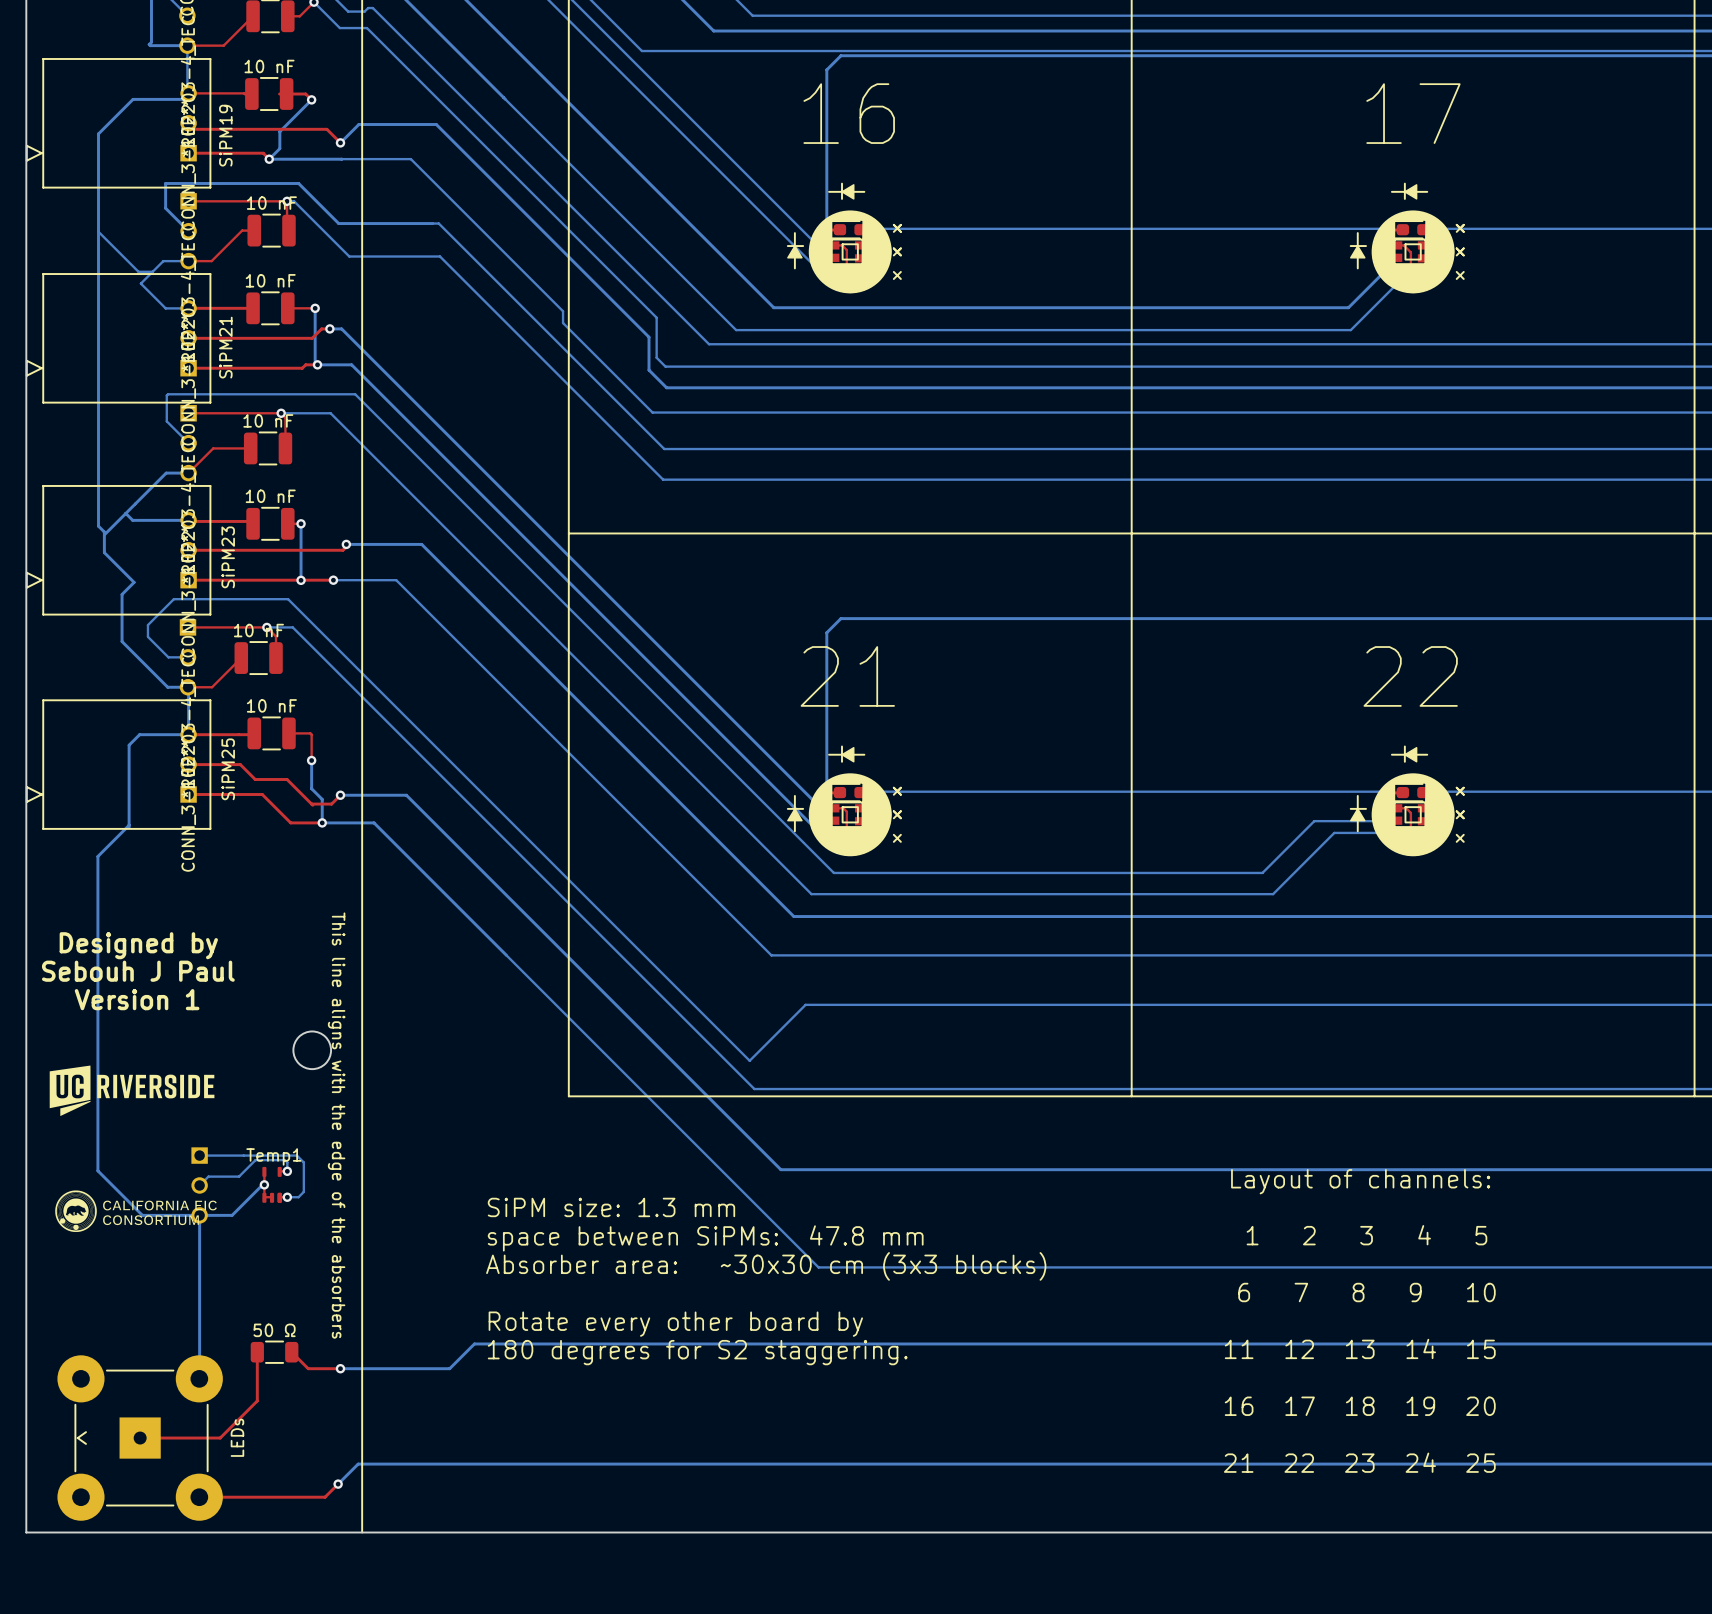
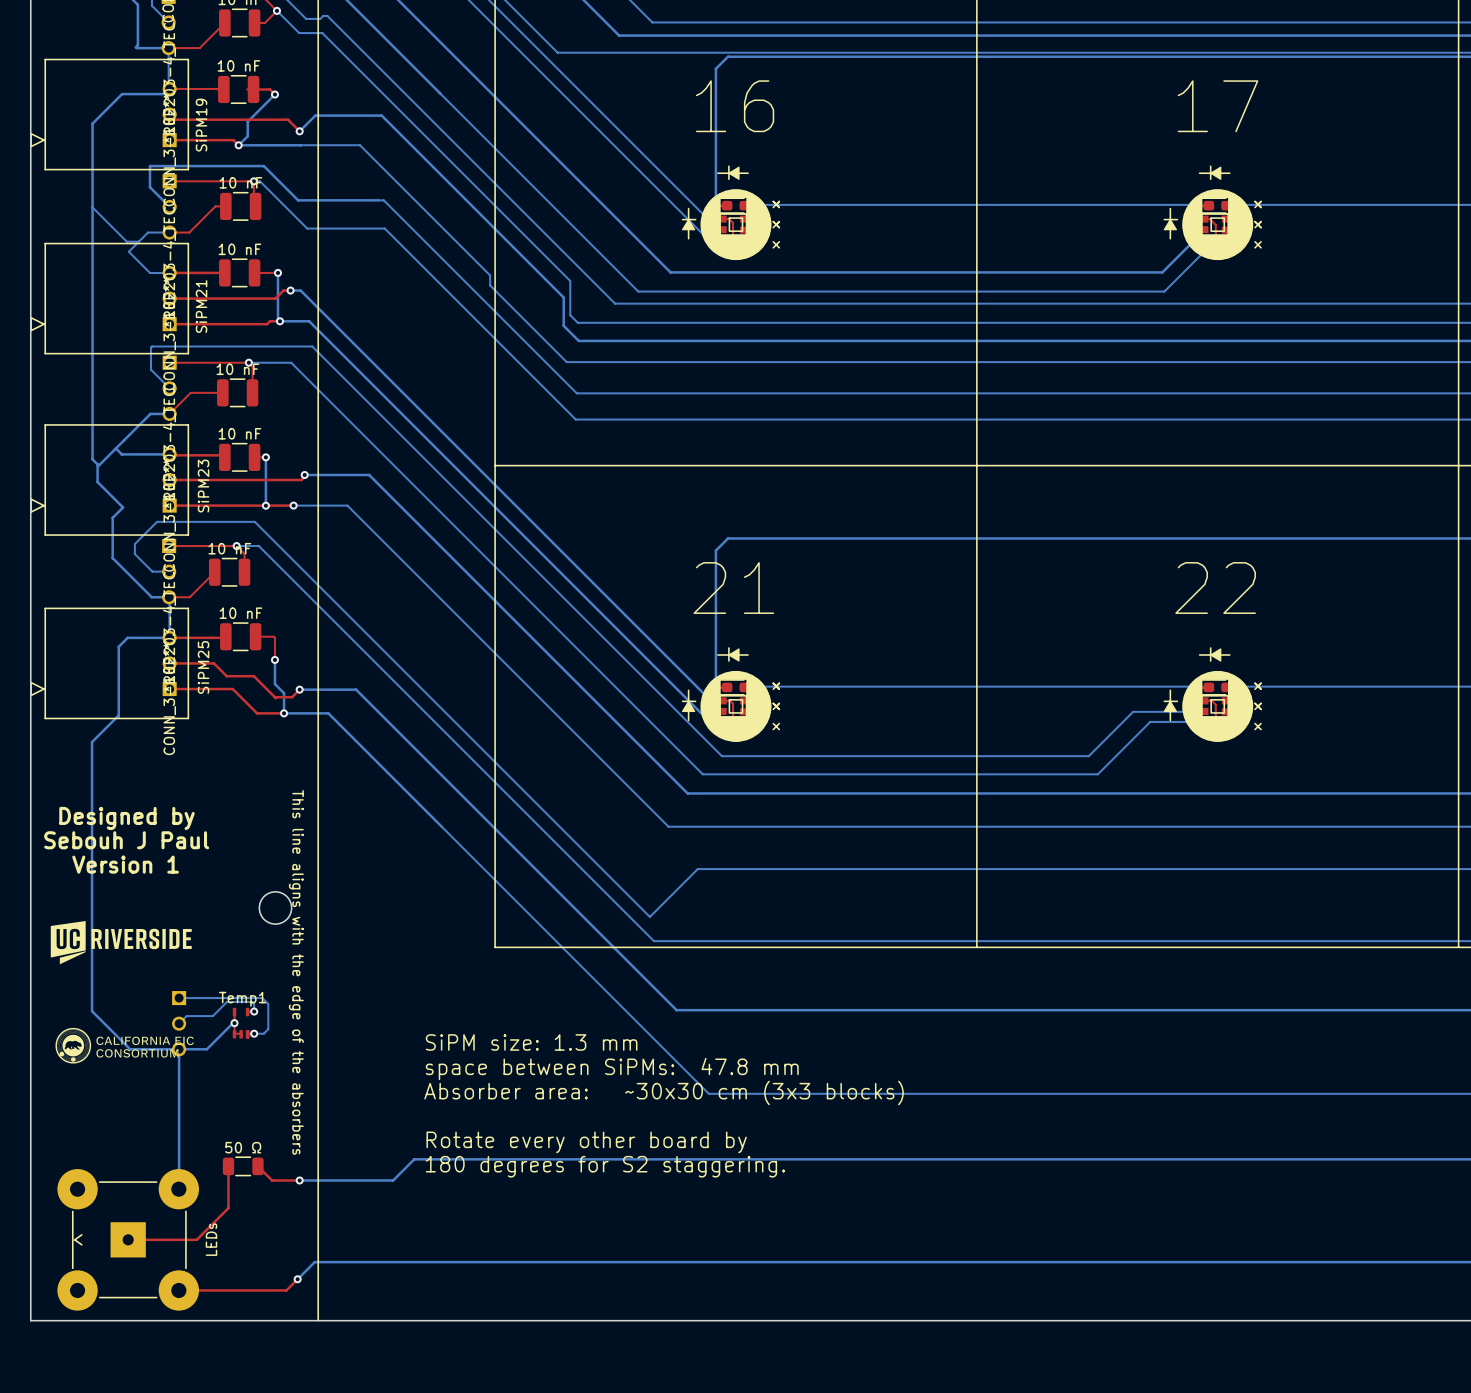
text: Layout of channels: (1360, 1181) -> none
text: 1 2 3 4 5 (1366, 1235) -> none
text: 6 7 8 9 10 (1366, 1292) -> none
text: 11 12 13 14 15 (1360, 1348) -> none
text: 16 17 18 19 20 (1360, 1406) -> none
text: 21 22 23 24 25 (1359, 1462) -> none

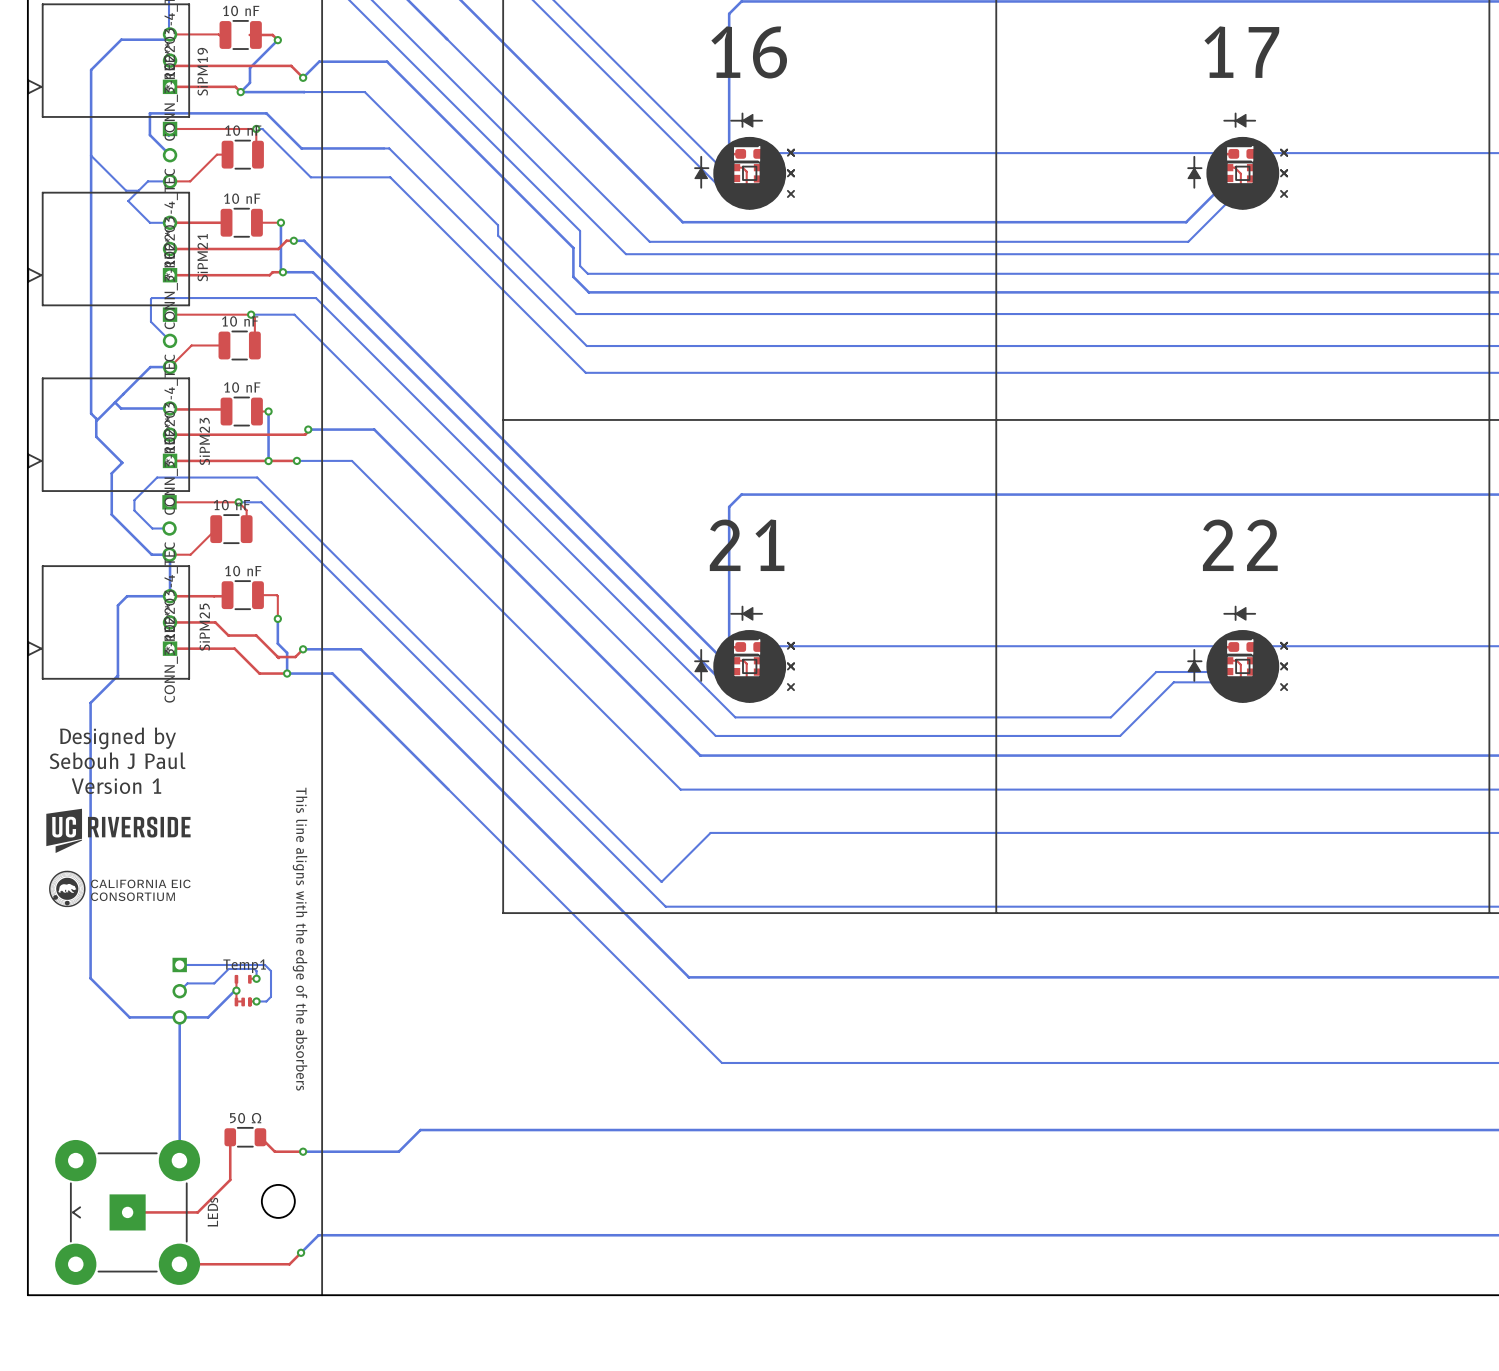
text position: Designed by (127, 818) -> Designed by (118, 738)
text position: Sebouh J Paul (126, 840) -> Sebouh J Paul (117, 760)
text position: Version 1 (125, 864) -> Version 1 (116, 786)
round board edge: [258, 891, 293, 925] -> none
drawing position: (121, 942) -> (118, 830)
text: SiPM size: 1.3 mm (531, 1042) -> none
drawing position: (124, 1045) -> (119, 888)
text: space between SiPMs: 47.8 mm (612, 1068) -> none
text: Absorber area: ~30x30 cm (3x3 blocks) (664, 1092) -> none
text: Rotate every other board by (586, 1142) -> none
text: 180 degrees for S2 staggering. (605, 1166) -> none
round board edge: none -> [261, 1184, 296, 1219]

